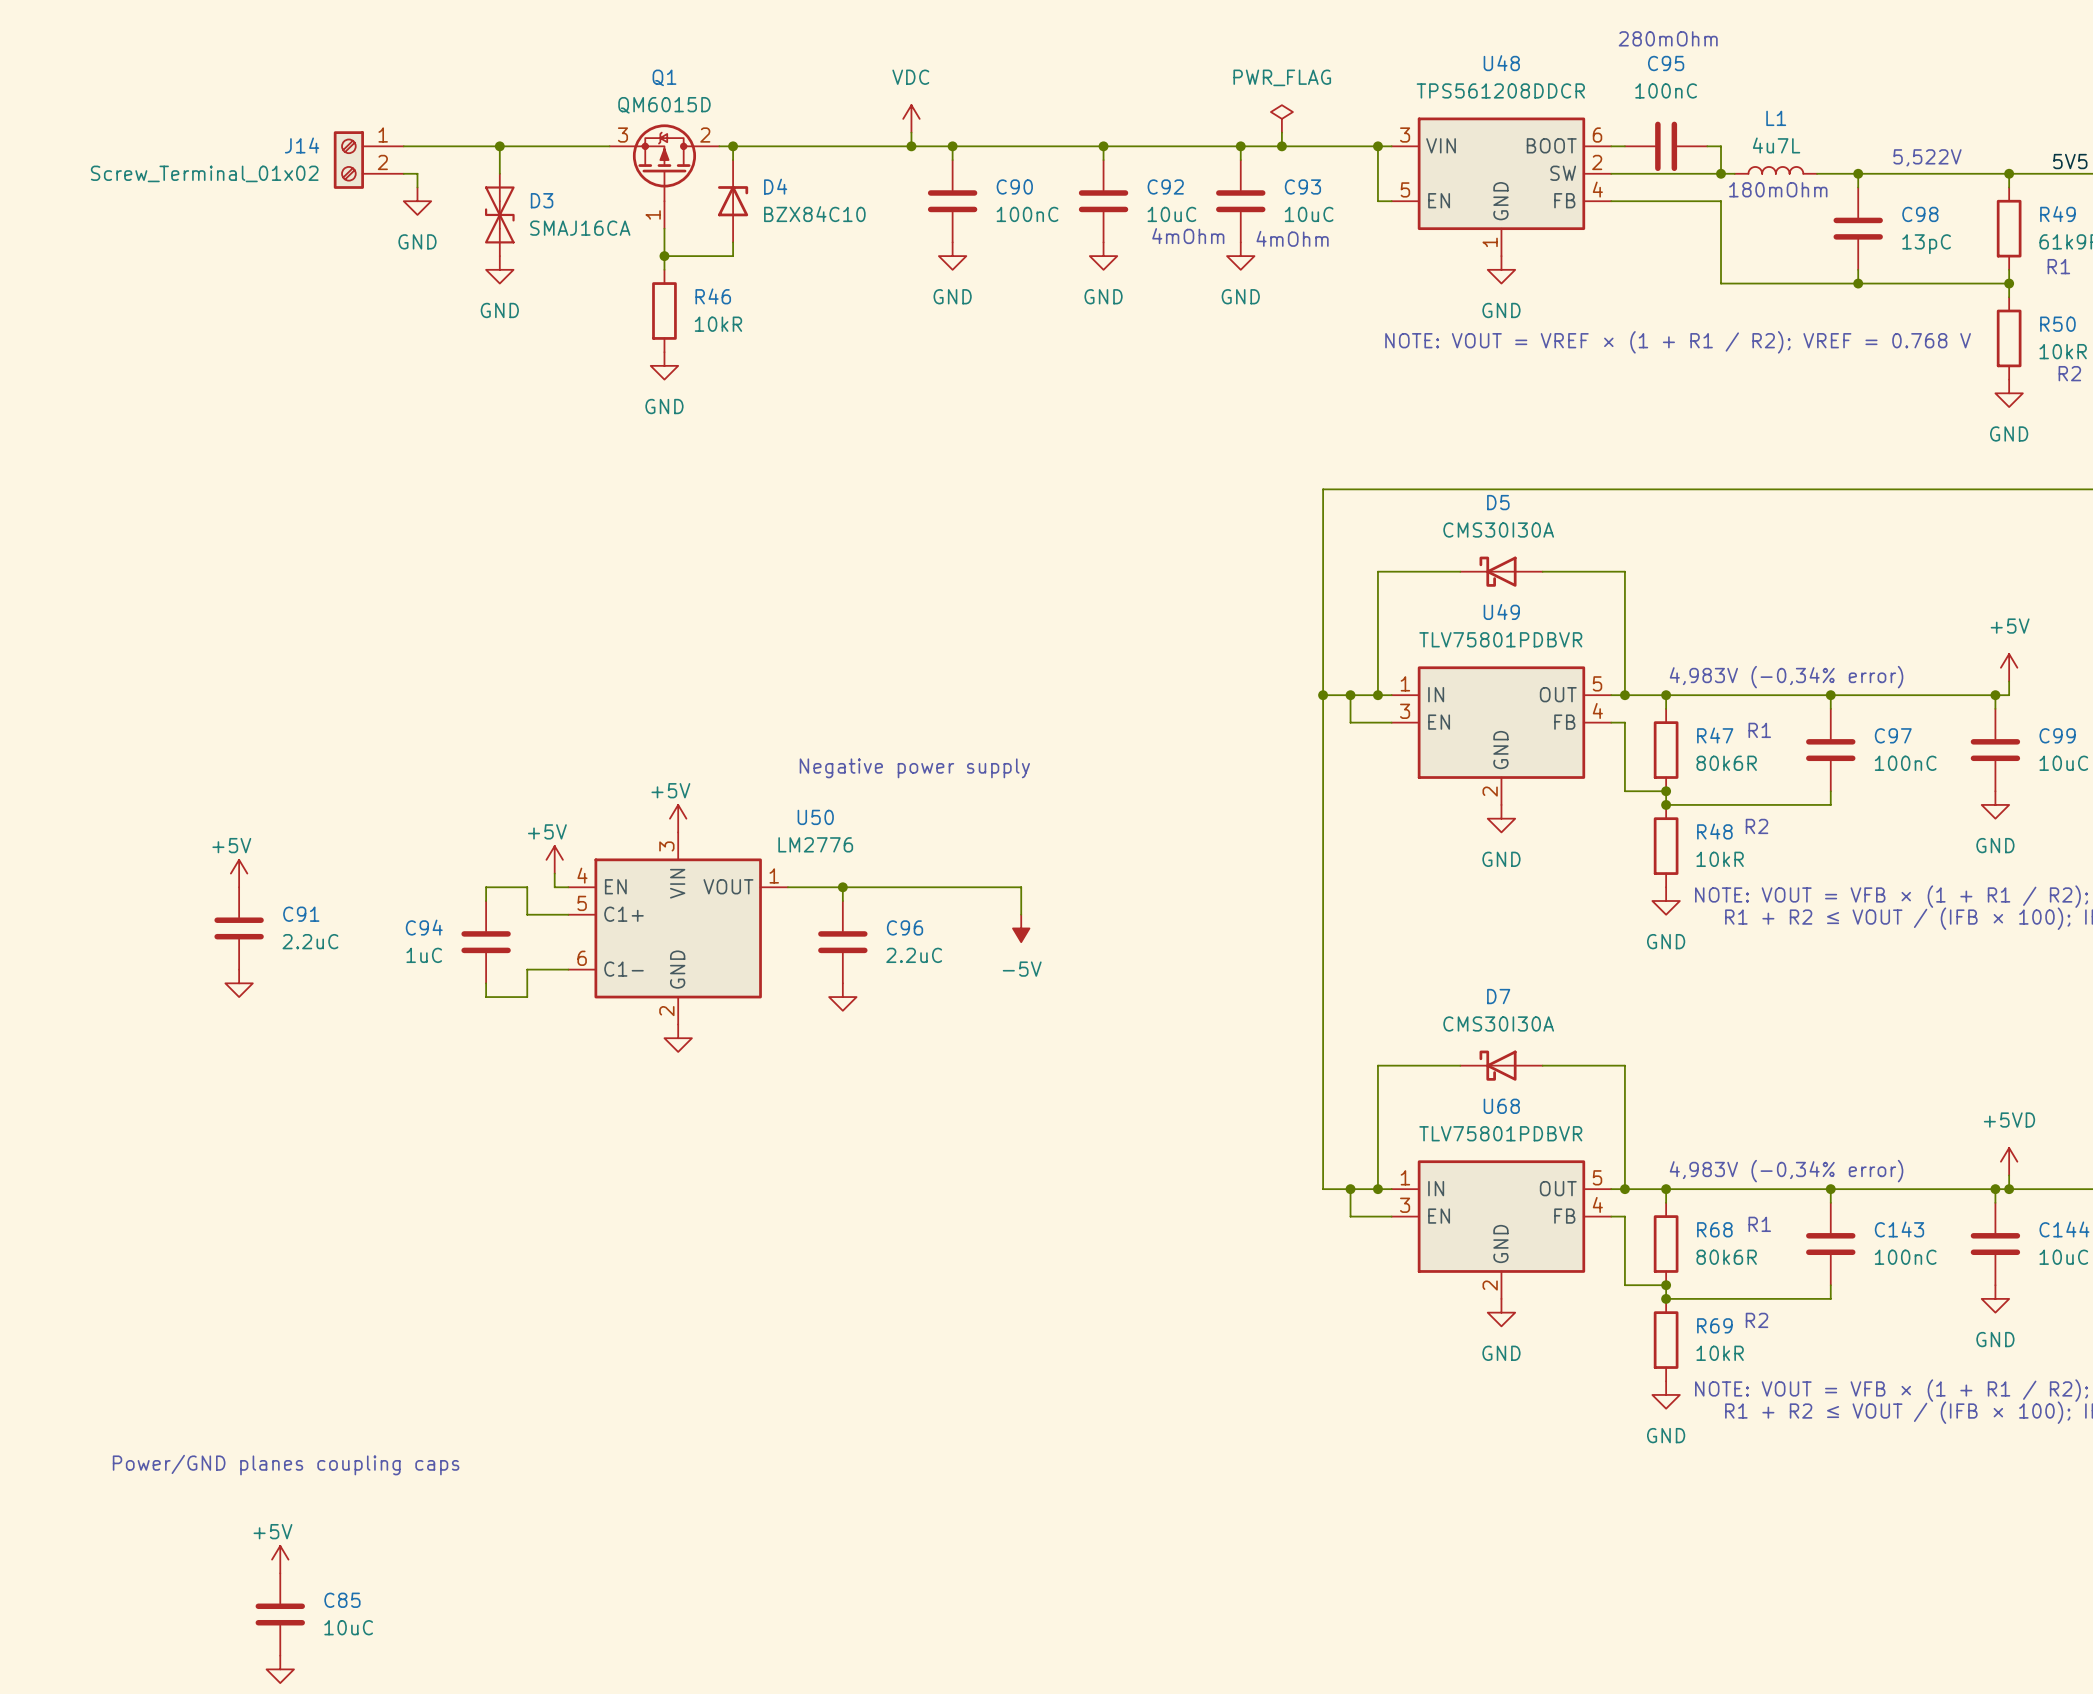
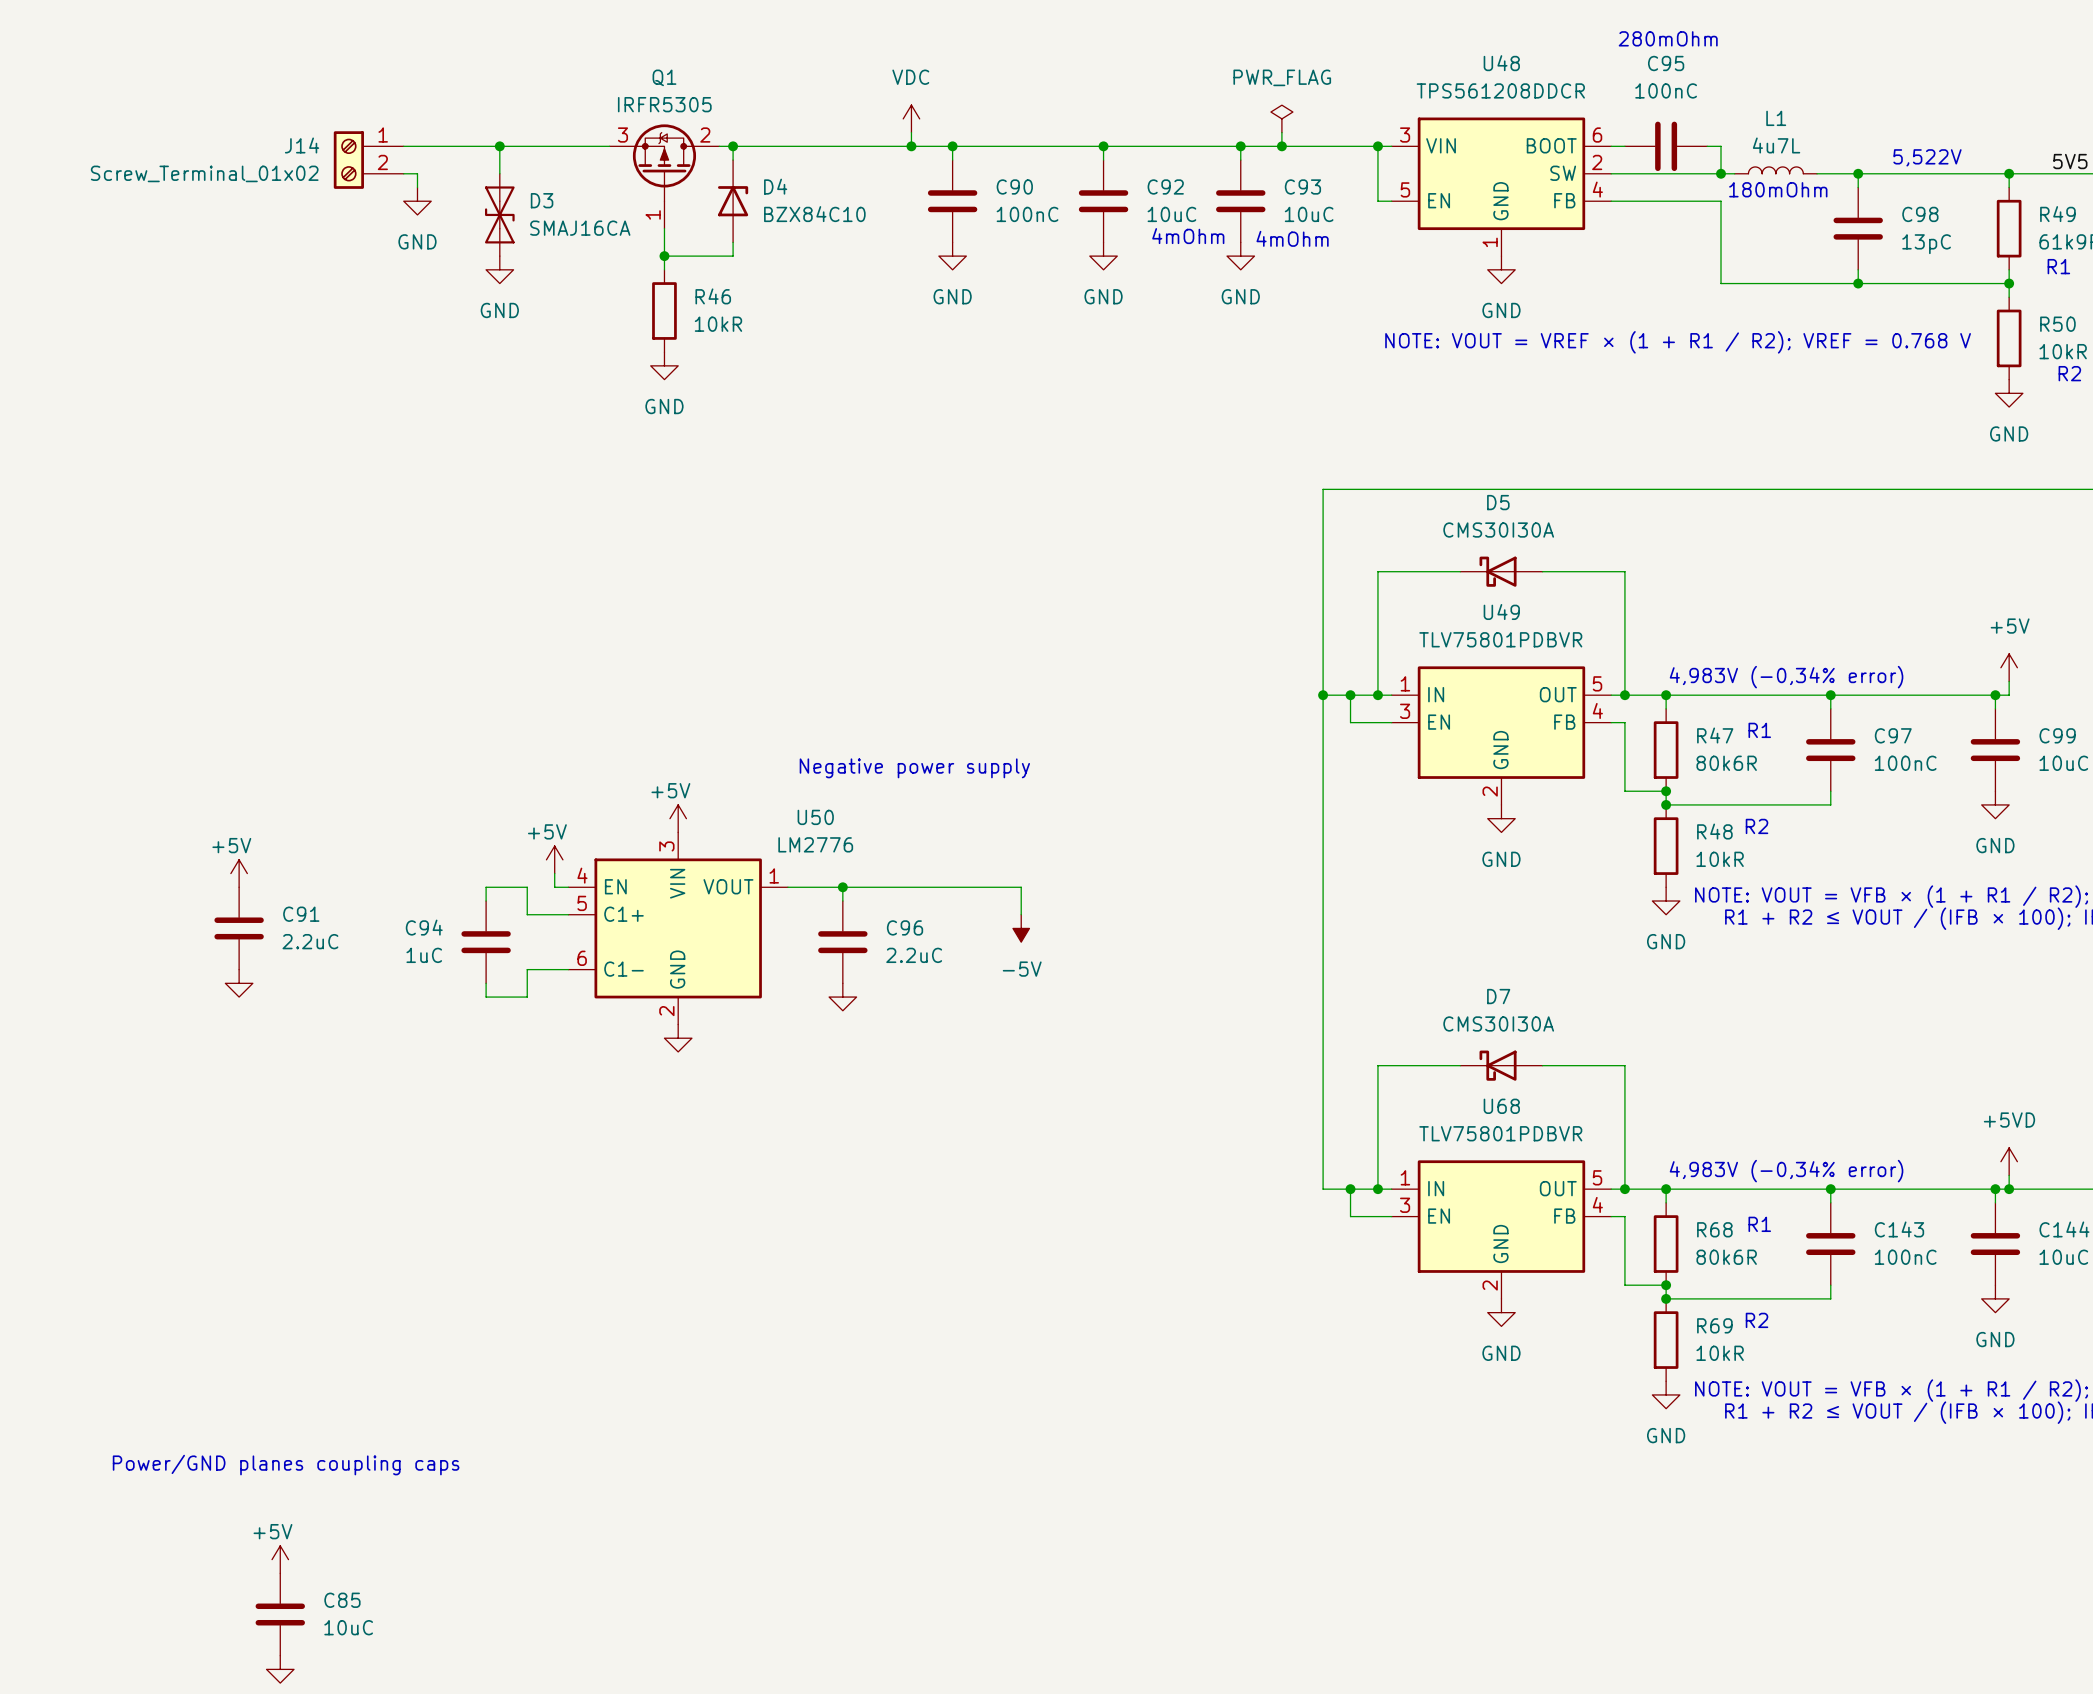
Q1 value: QM6015D (664, 105) -> IRFR5305 (664, 104)

